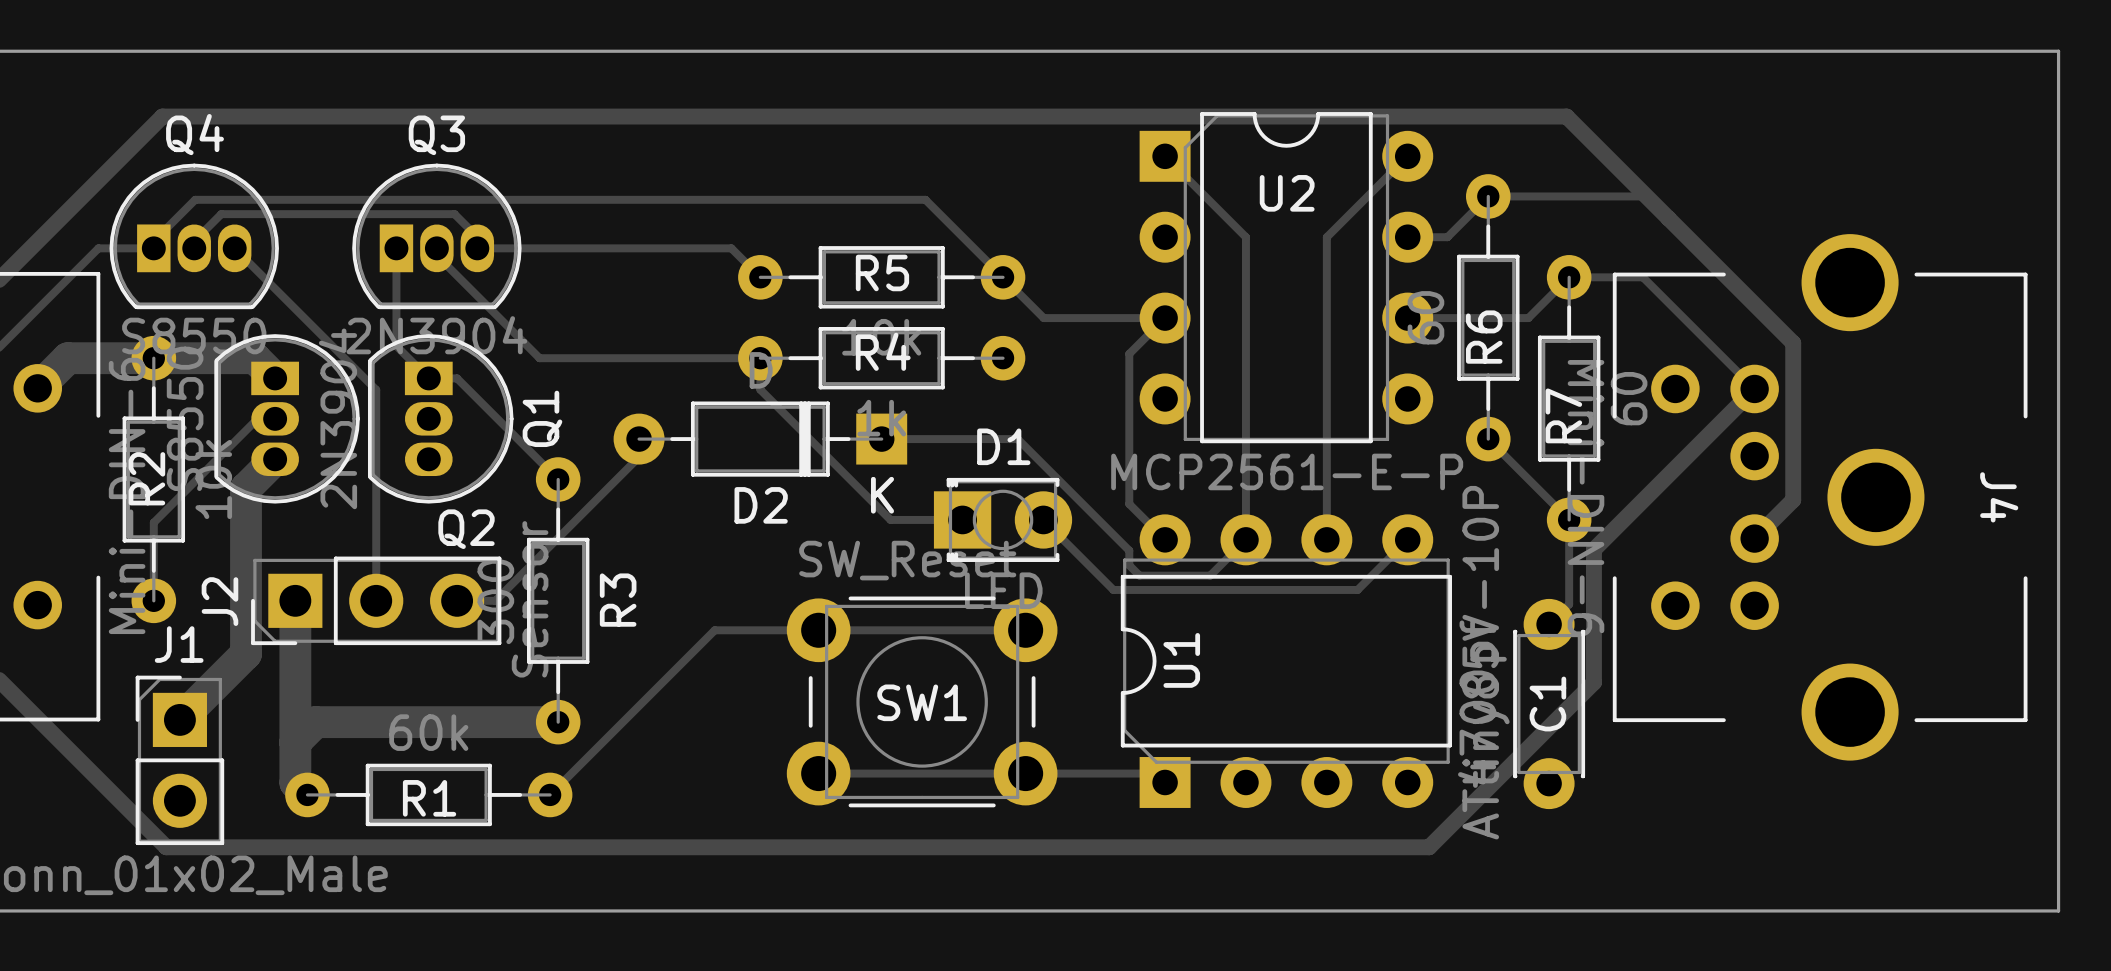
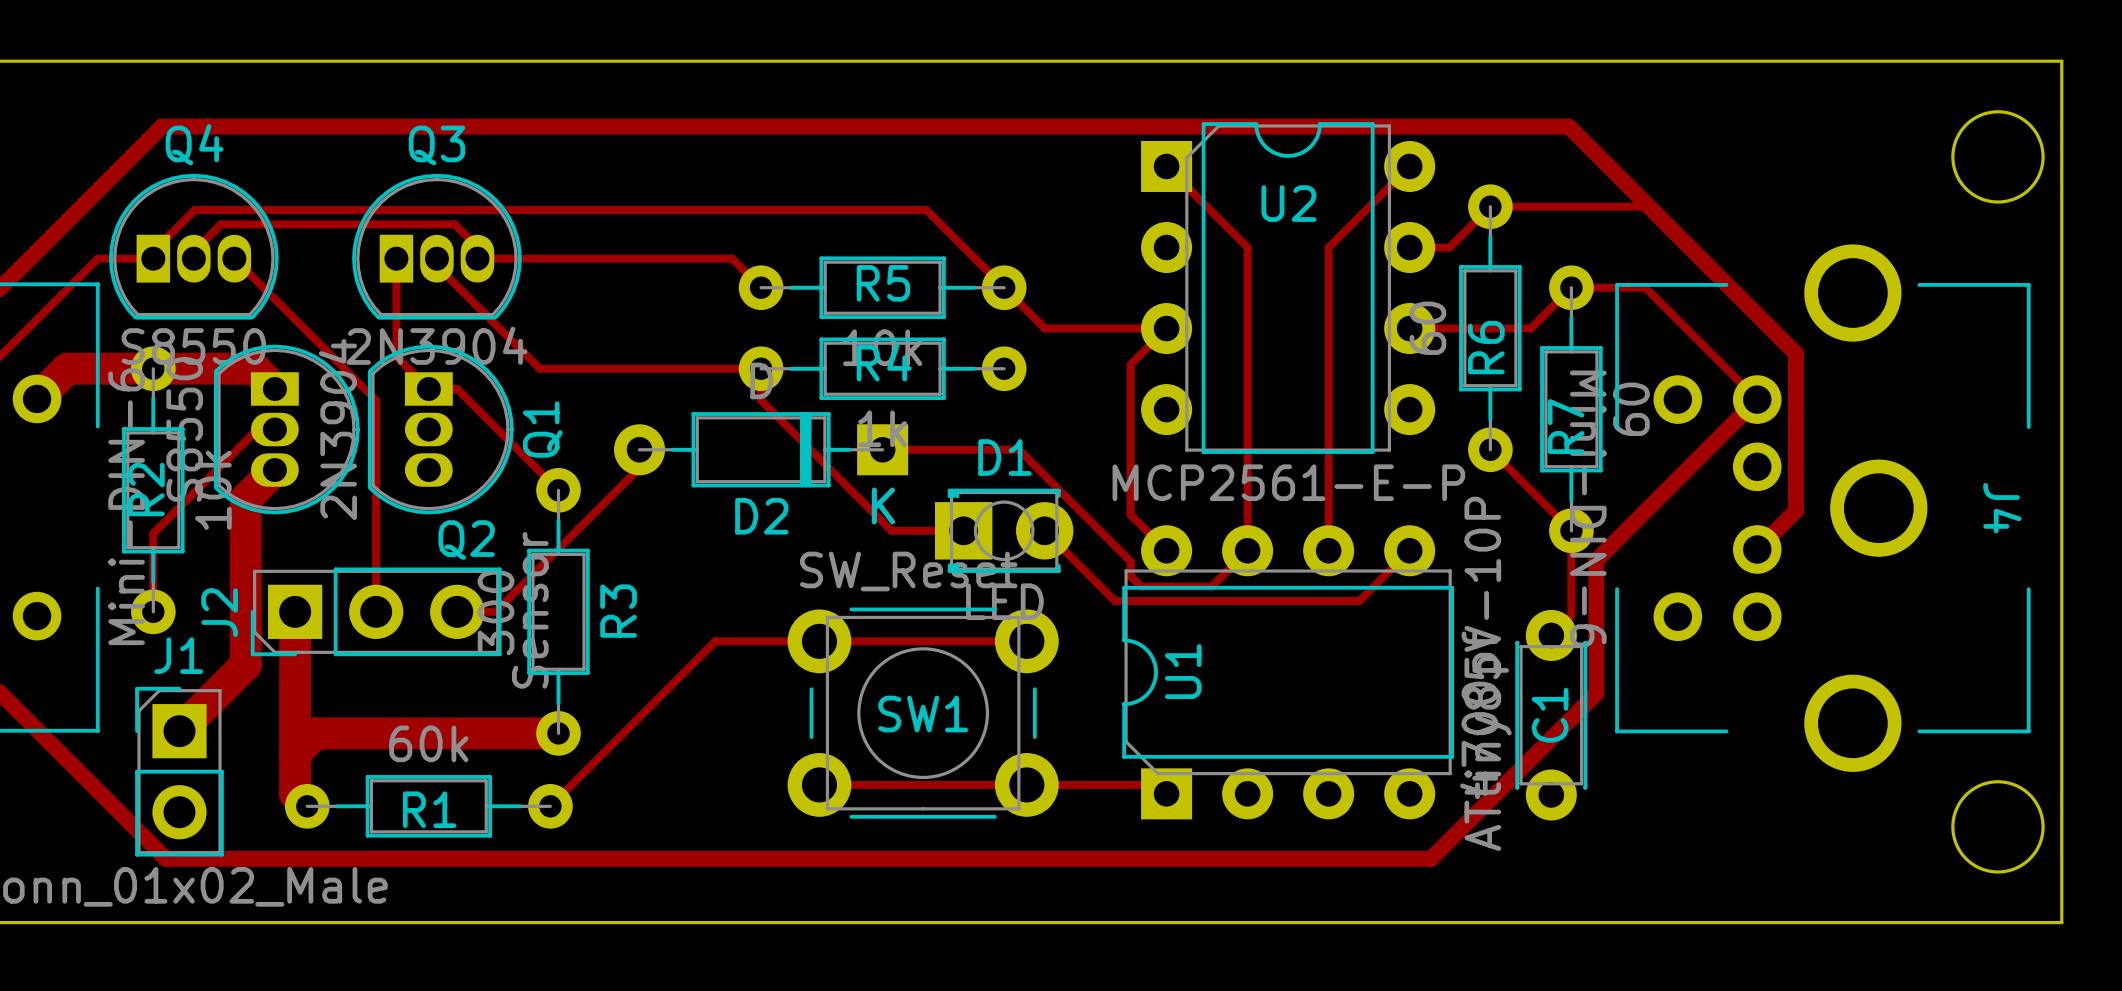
round board edge: none -> [1951, 110, 2045, 204]
round board edge: none -> [1951, 780, 2045, 874]

